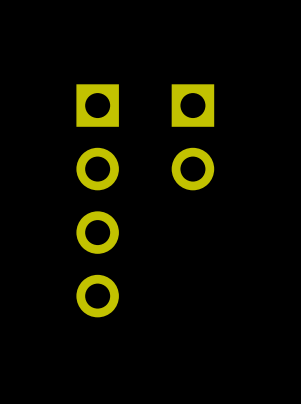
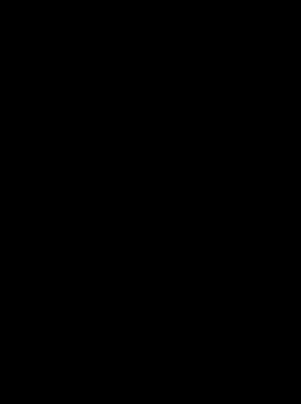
part: (192, 137) -> none
part: (97, 200) -> none

